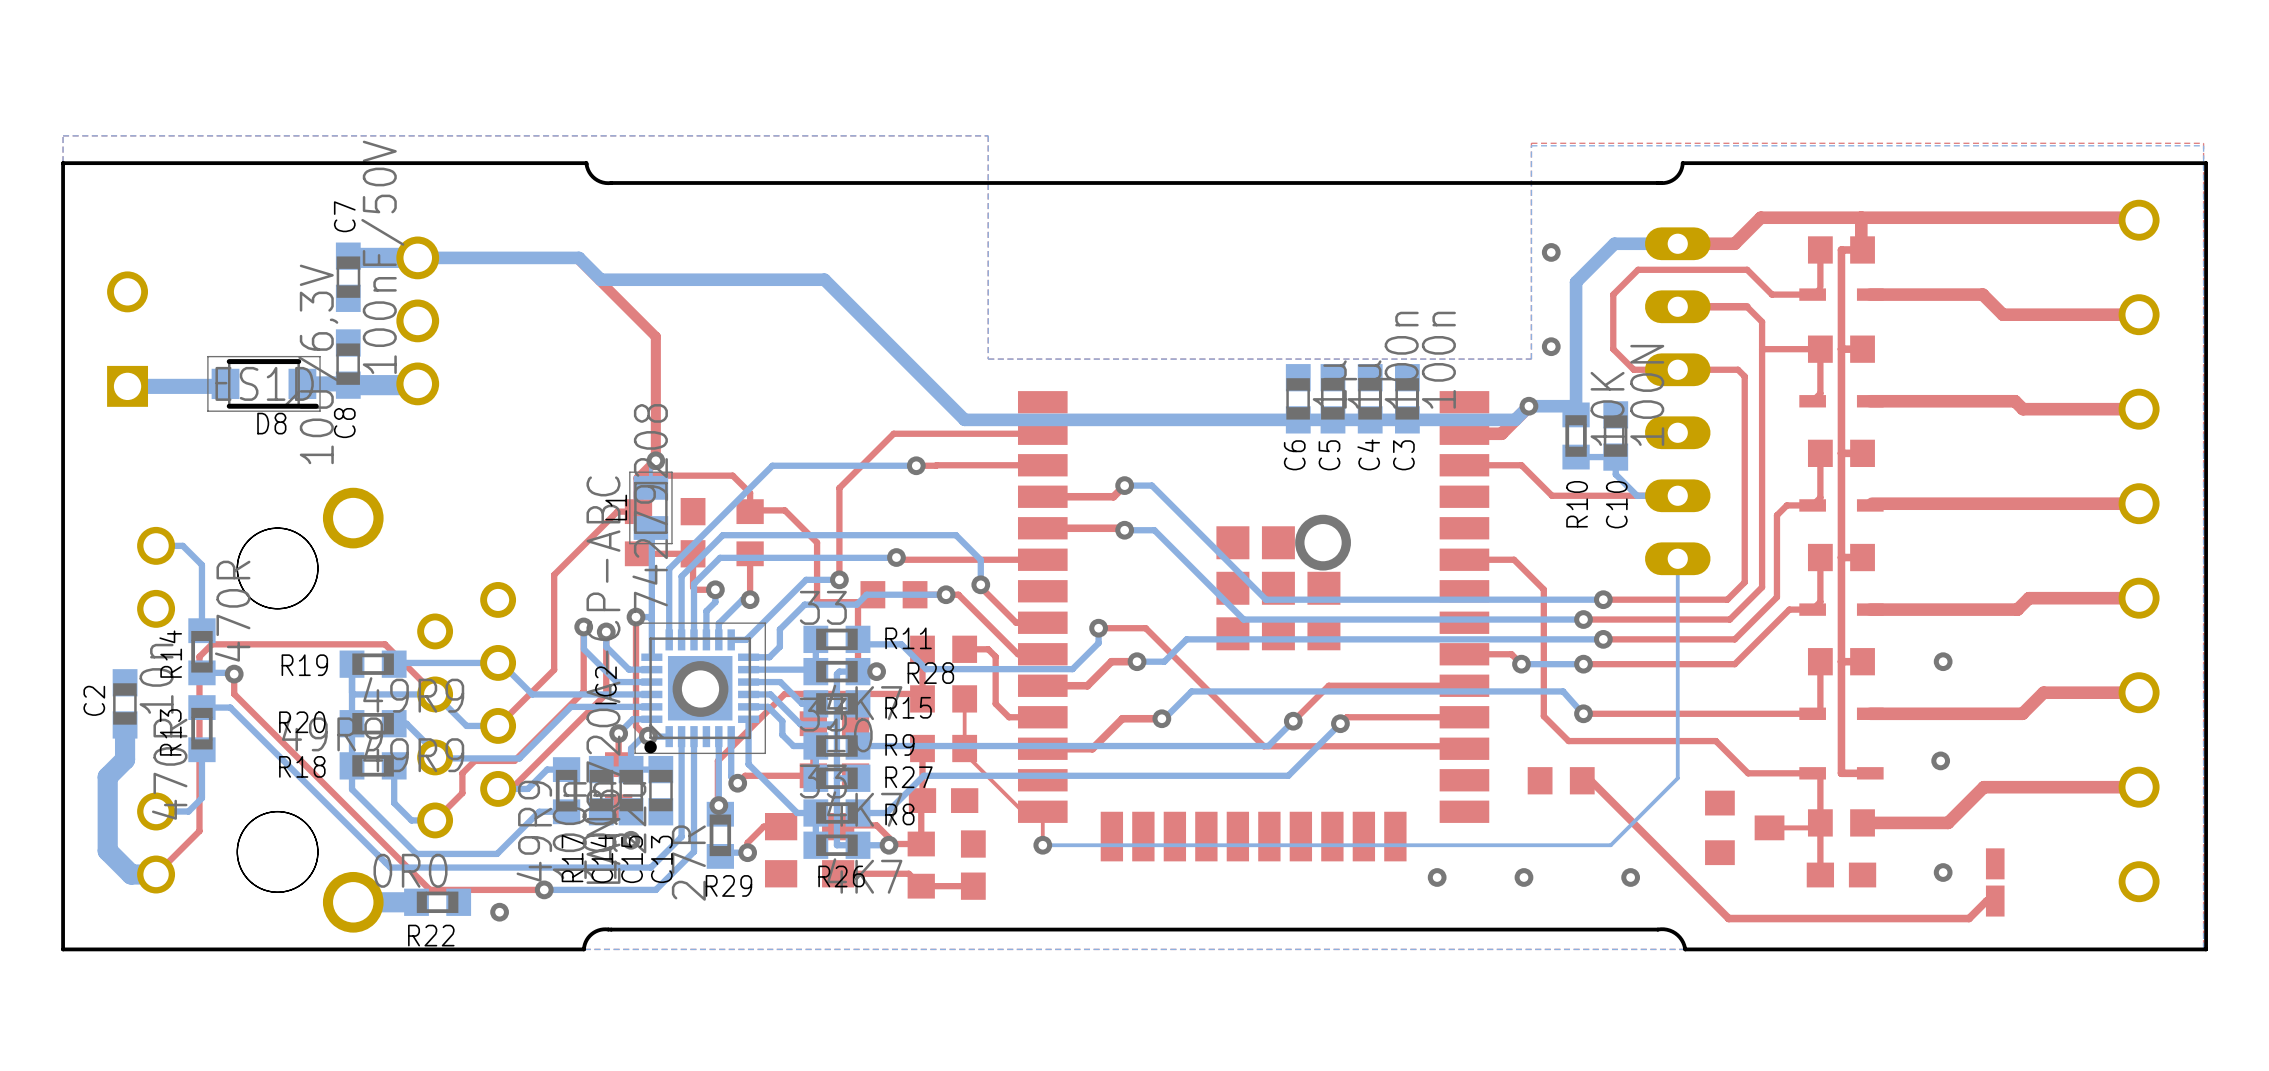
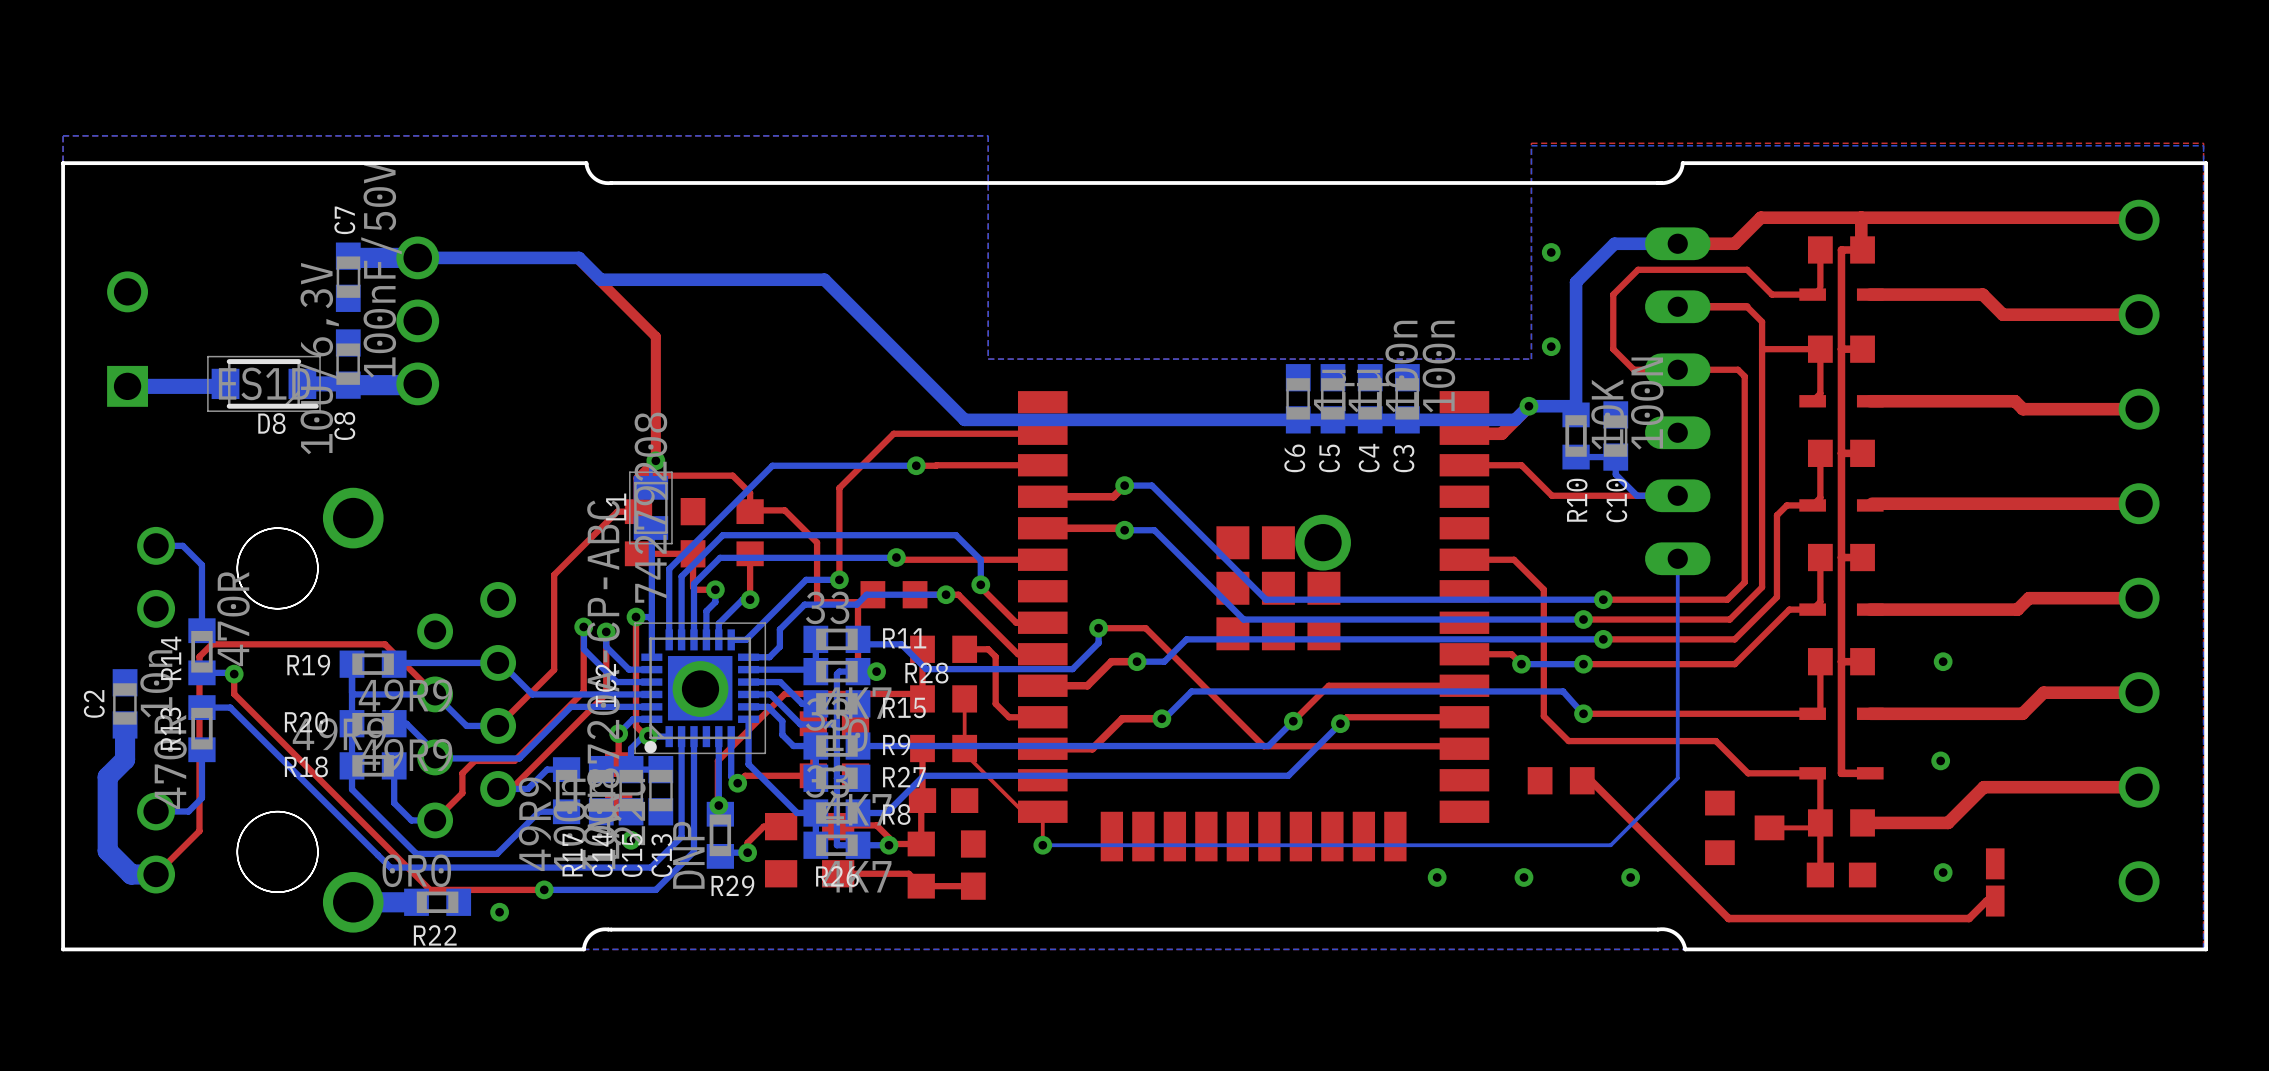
R29 value: 27R (688, 863) -> DNP (688, 855)

